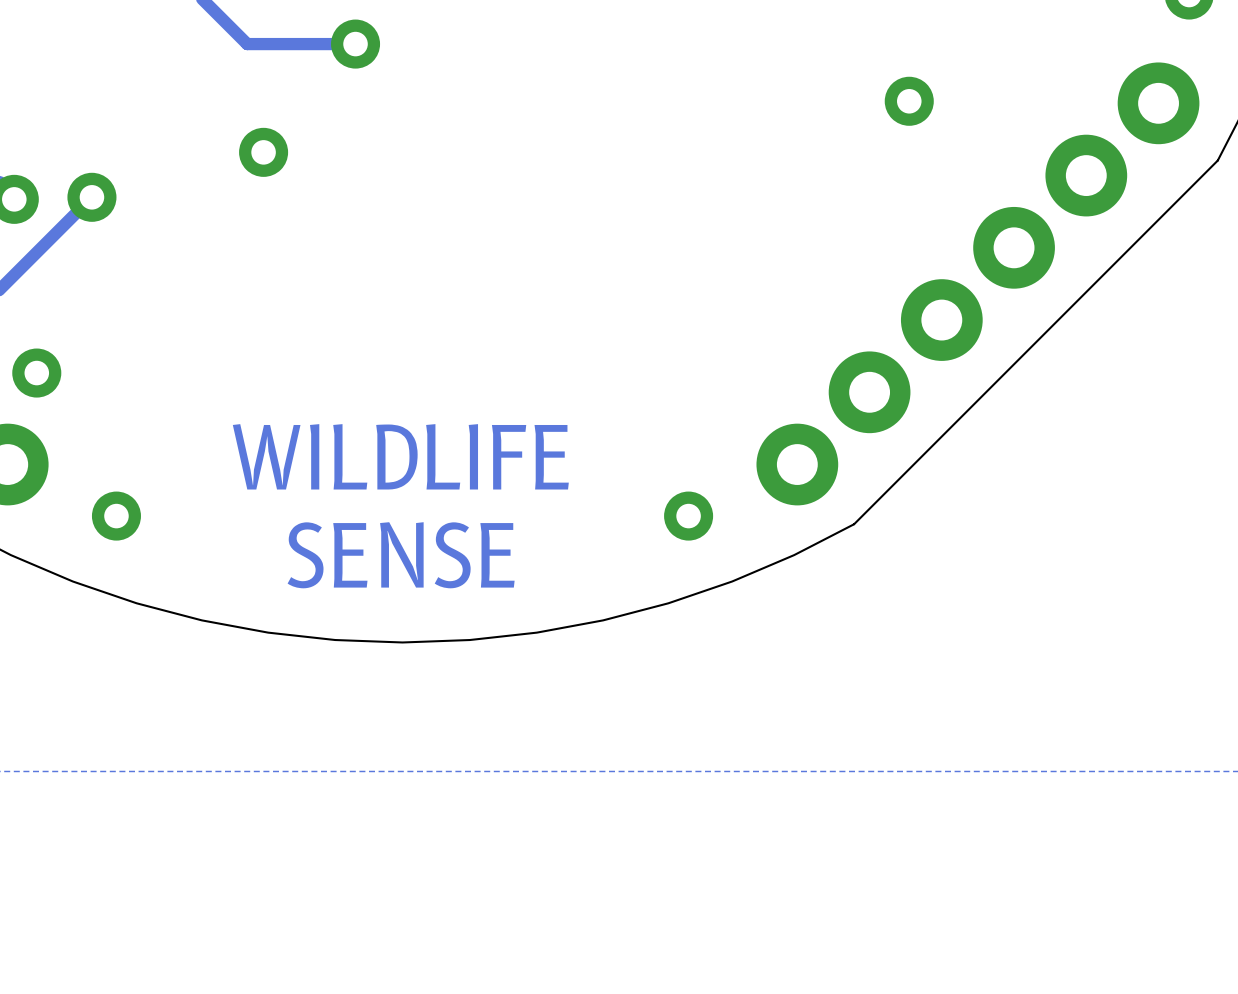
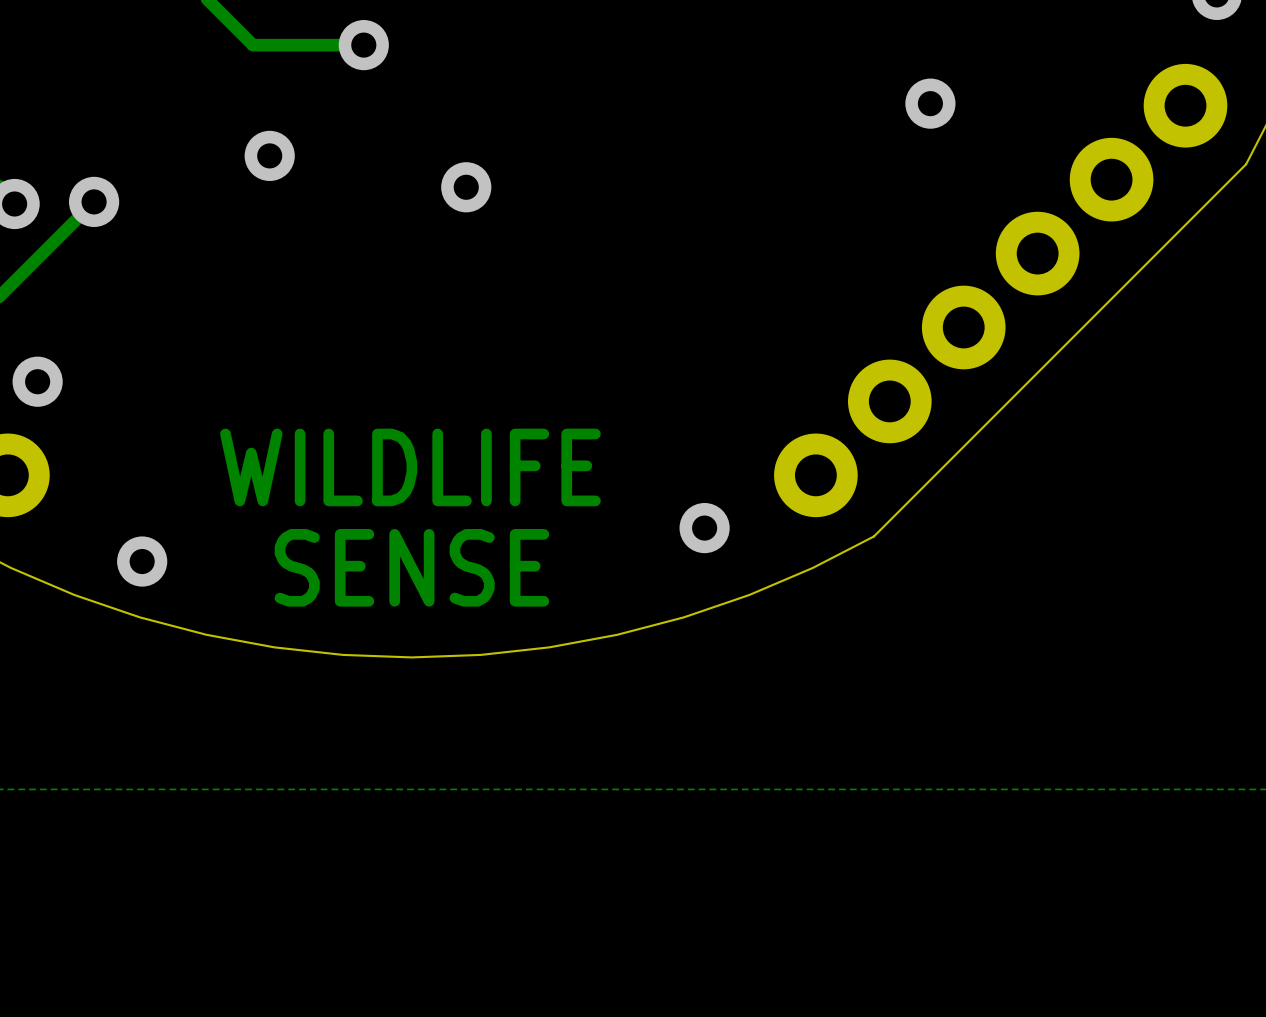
via: none -> (466, 187)
via position: (116, 516) -> (142, 561)

